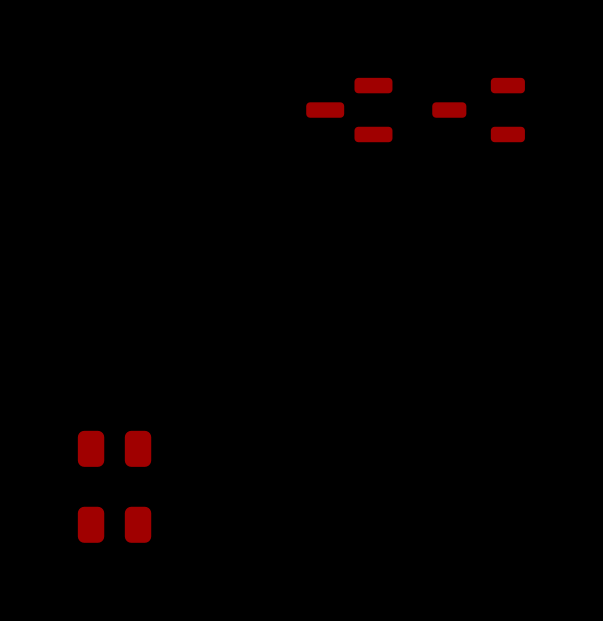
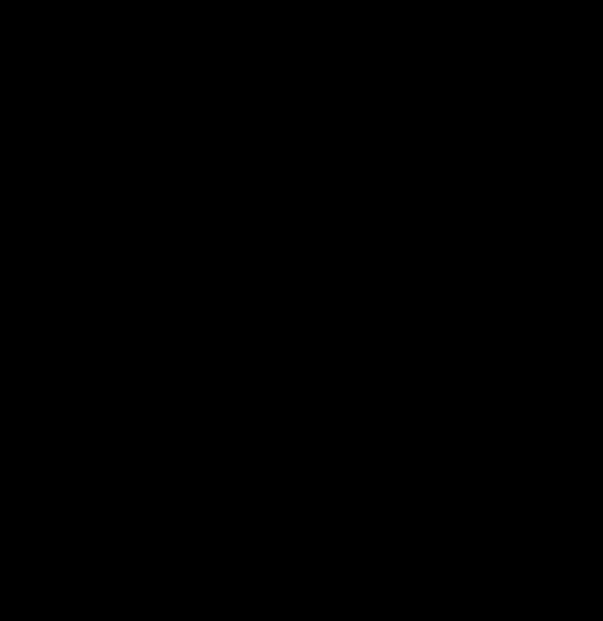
part: (349, 110) -> none
part: (478, 110) -> none
part: (114, 448) -> none
part: (114, 524) -> none

